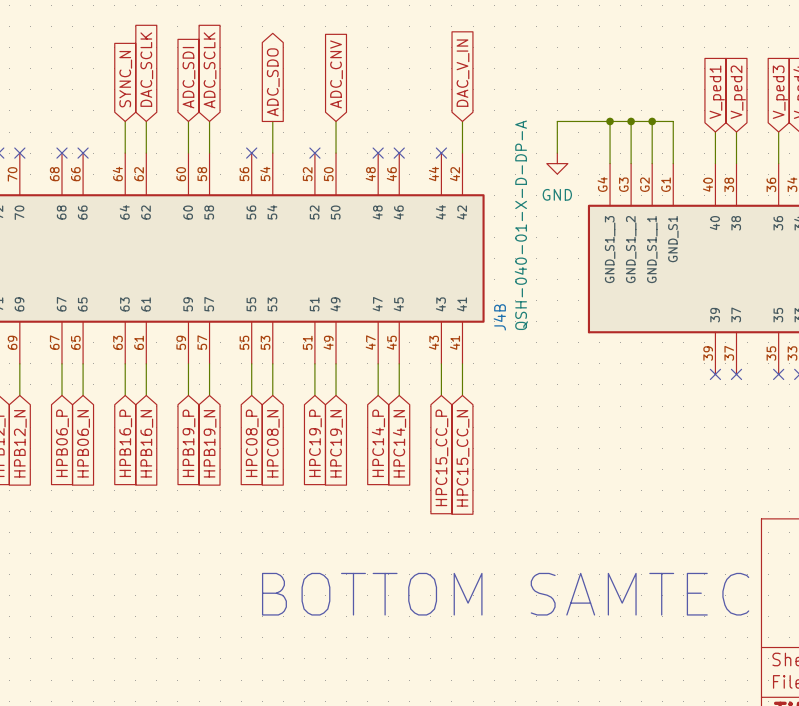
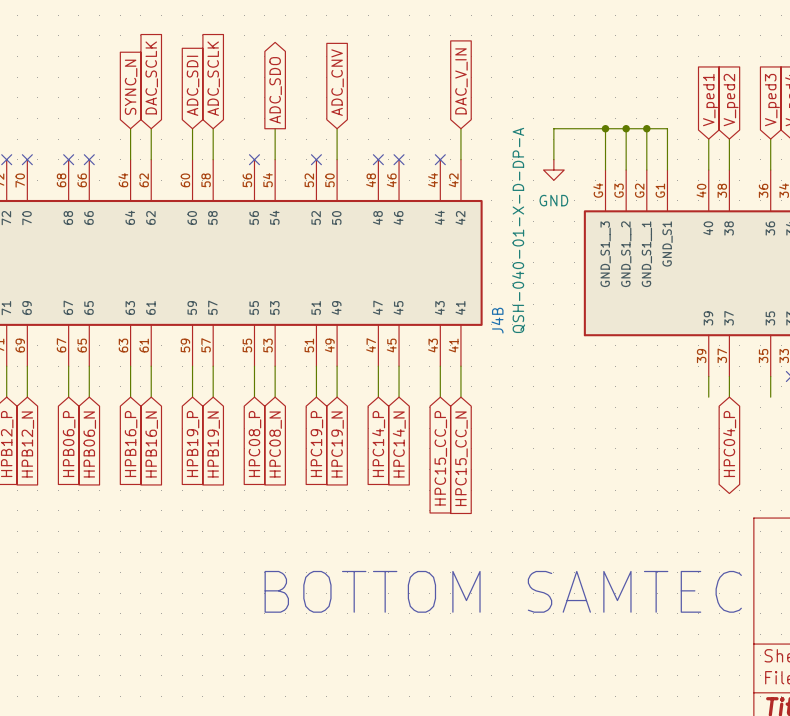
wire: none -> (708, 376) (708, 397)
no-connect mark: (715, 374) -> none
wire: none -> (729, 376) (729, 397)
no-connect mark: (736, 374) -> none
wire: none -> (770, 376) (770, 397)
no-connect mark: (778, 374) -> none
global label: none -> HPC04_P (729, 444)

